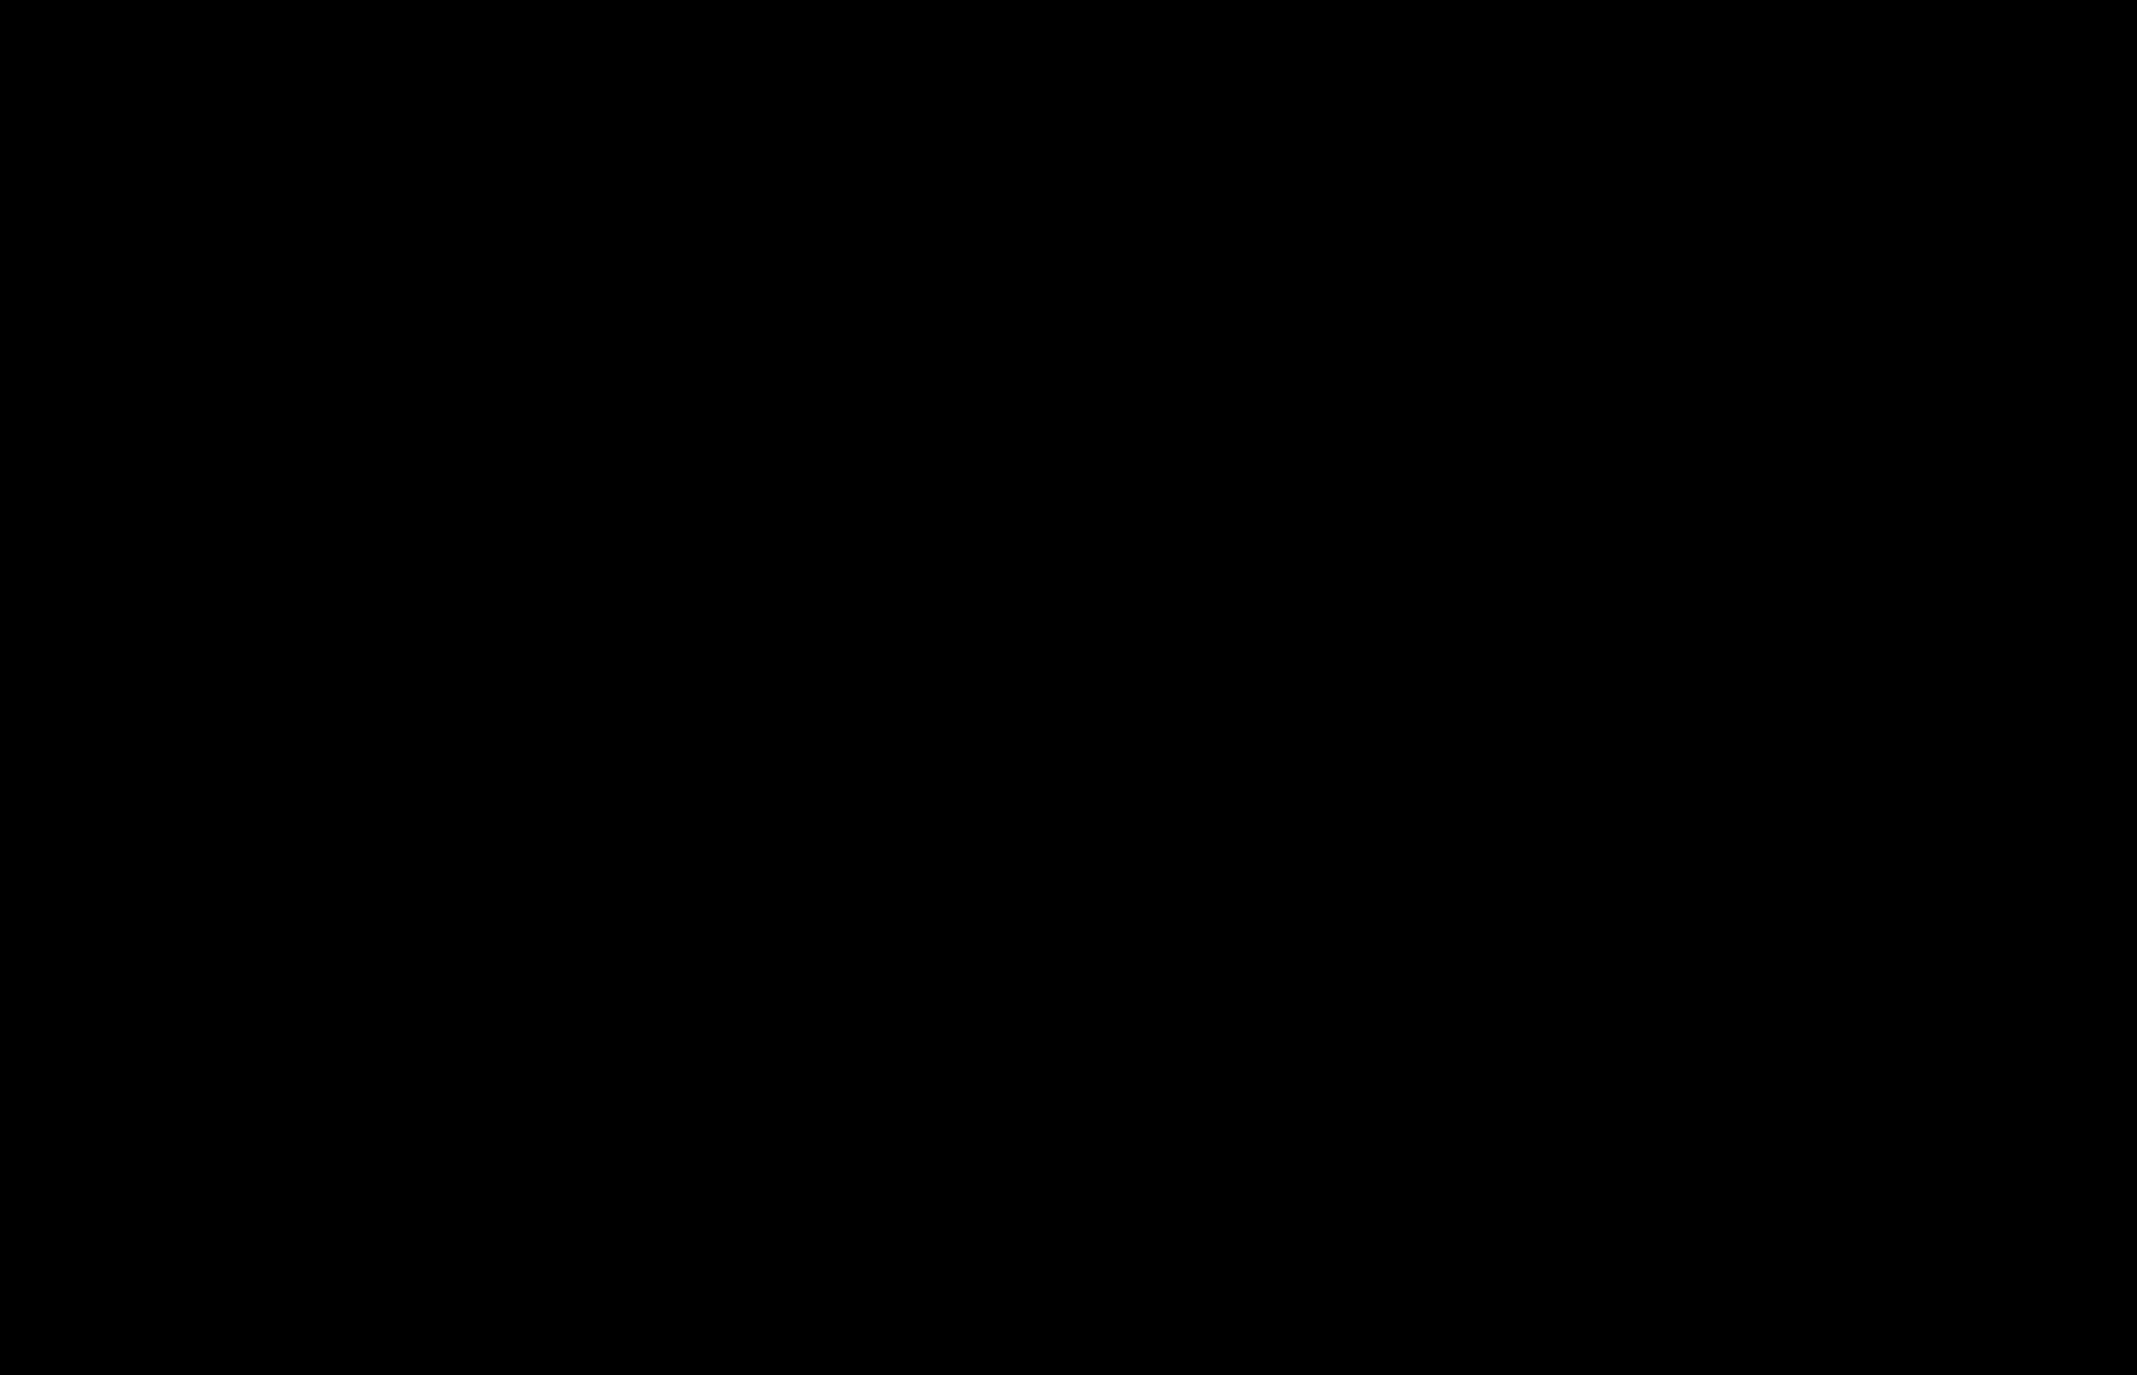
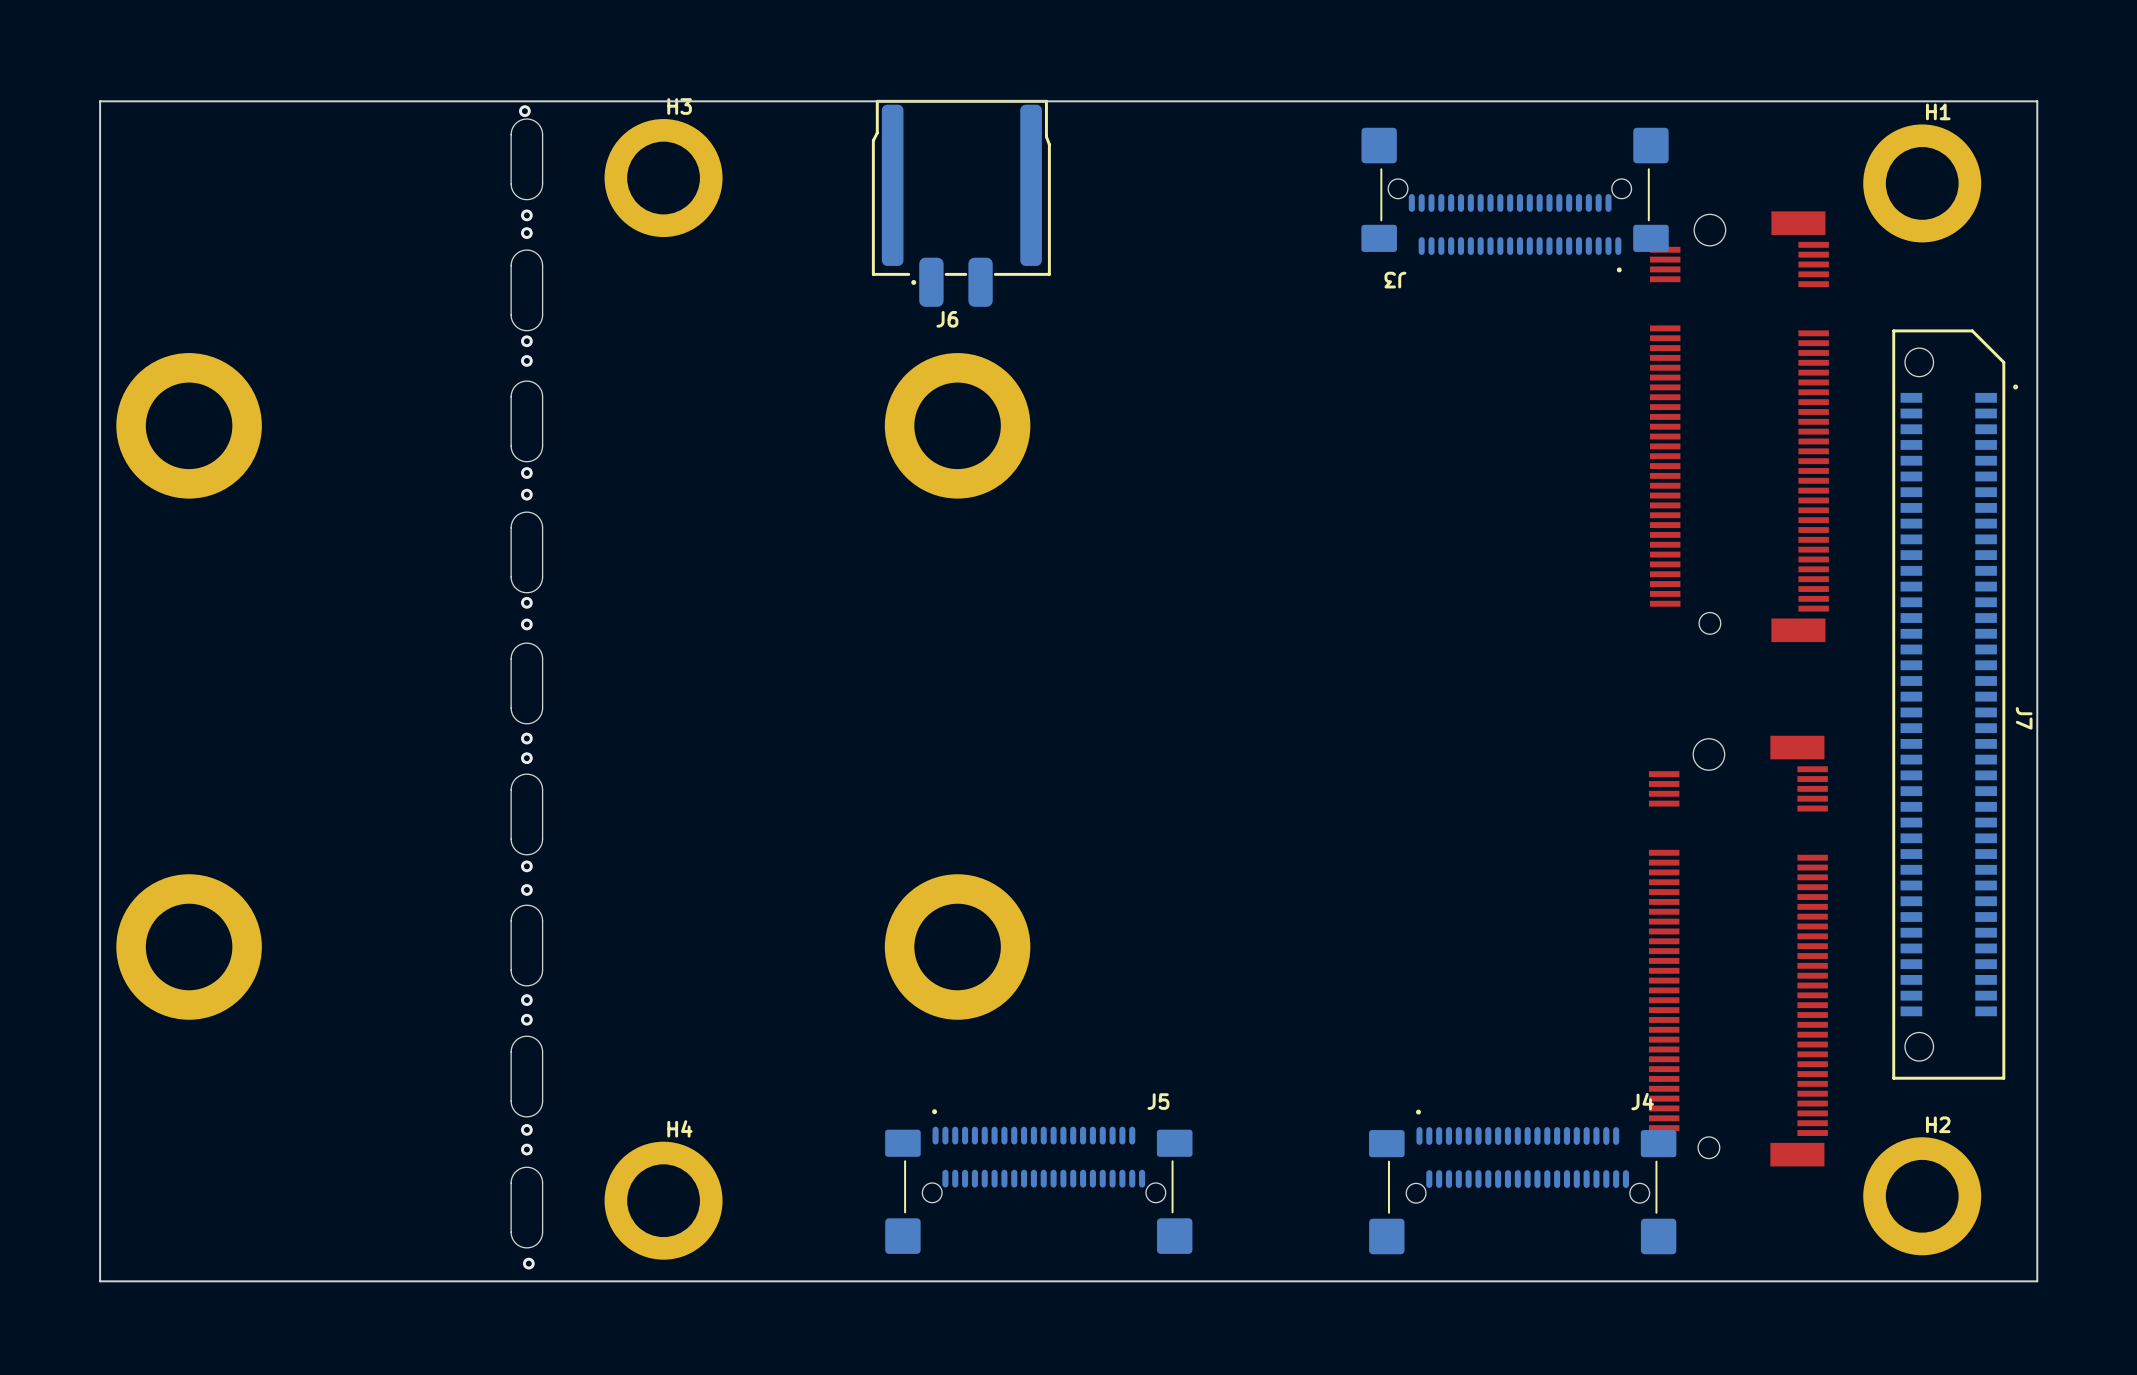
board edge: none -> (2037, 101) (100, 101) (100, 1281) (2037, 1281) (2037, 101)
via: none -> (524, 111)
board edge: none -> (542, 134) (542, 187) (534, 197) (522, 199) (515, 195) (511, 185) (511, 130) (517, 122) (528, 119) (539, 125) (542, 134)
H3: none -> (663, 178)
H1: none -> (1922, 183)
J3: none -> (1515, 200)
J6: none -> (961, 203)
via: none -> (526, 215)
via: none -> (526, 233)
board edge: none -> (542, 265) (542, 319) (534, 328) (522, 330) (515, 326) (511, 317) (511, 261) (519, 252) (528, 250) (537, 254) (542, 265)
via: none -> (526, 341)
via: none -> (526, 360)
board edge: none -> (542, 396) (542, 450) (534, 459) (522, 461) (515, 457) (511, 448) (511, 392) (517, 384) (528, 381) (539, 387) (542, 396)
part: none -> (189, 425)
part: none -> (957, 425)
part: none -> (1739, 426)
via: none -> (526, 473)
via: none -> (526, 494)
board edge: none -> (542, 527) (541, 582) (534, 590) (521, 591) (515, 587) (511, 578) (511, 523) (519, 514) (528, 512) (537, 516) (542, 527)
via: none -> (526, 602)
via: none -> (526, 624)
board edge: none -> (542, 658) (542, 712) (534, 721) (522, 723) (514, 717) (511, 710) (511, 654) (519, 645) (528, 643) (537, 647) (542, 658)
J7: none -> (1955, 704)
via: none -> (526, 738)
via: none -> (526, 758)
board edge: none -> (542, 789) (542, 843) (534, 852) (522, 854) (514, 848) (511, 841) (511, 785) (519, 776) (528, 774) (537, 778) (542, 789)
via: none -> (526, 866)
via: none -> (526, 889)
board edge: none -> (542, 920) (541, 975) (532, 984) (521, 984) (513, 979) (511, 971) (511, 916) (519, 907) (528, 905) (539, 911) (542, 920)
part: none -> (189, 947)
part: none -> (957, 947)
part: none -> (1738, 951)
via: none -> (526, 1000)
via: none -> (526, 1019)
board edge: none -> (542, 1051) (542, 1105) (534, 1114) (522, 1116) (515, 1112) (511, 1103) (511, 1047) (519, 1038) (528, 1036) (539, 1042) (542, 1051)
via: none -> (526, 1129)
via: none -> (526, 1149)
J5: none -> (1038, 1181)
J4: none -> (1522, 1181)
board edge: none -> (542, 1182) (542, 1236) (534, 1245) (522, 1247) (515, 1243) (511, 1234) (511, 1178) (517, 1170) (528, 1167) (539, 1173) (542, 1182)
H2: none -> (1922, 1196)
H4: none -> (663, 1200)
via: none -> (528, 1263)

